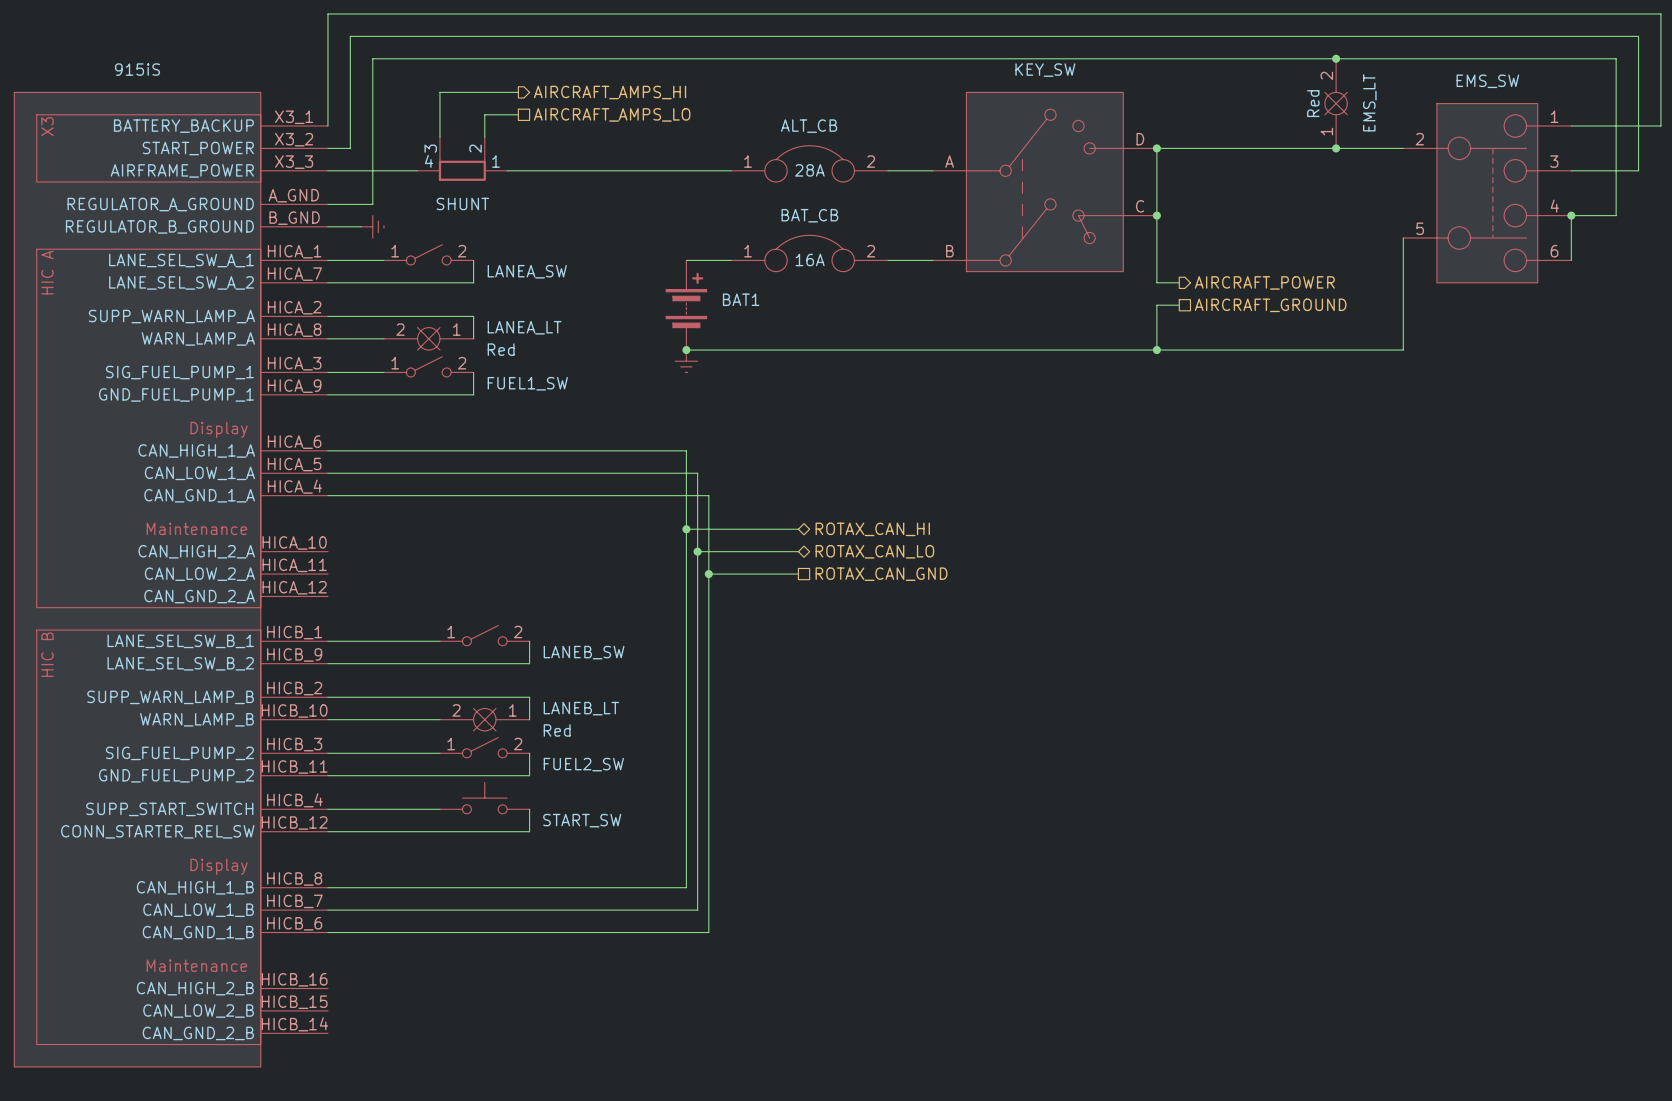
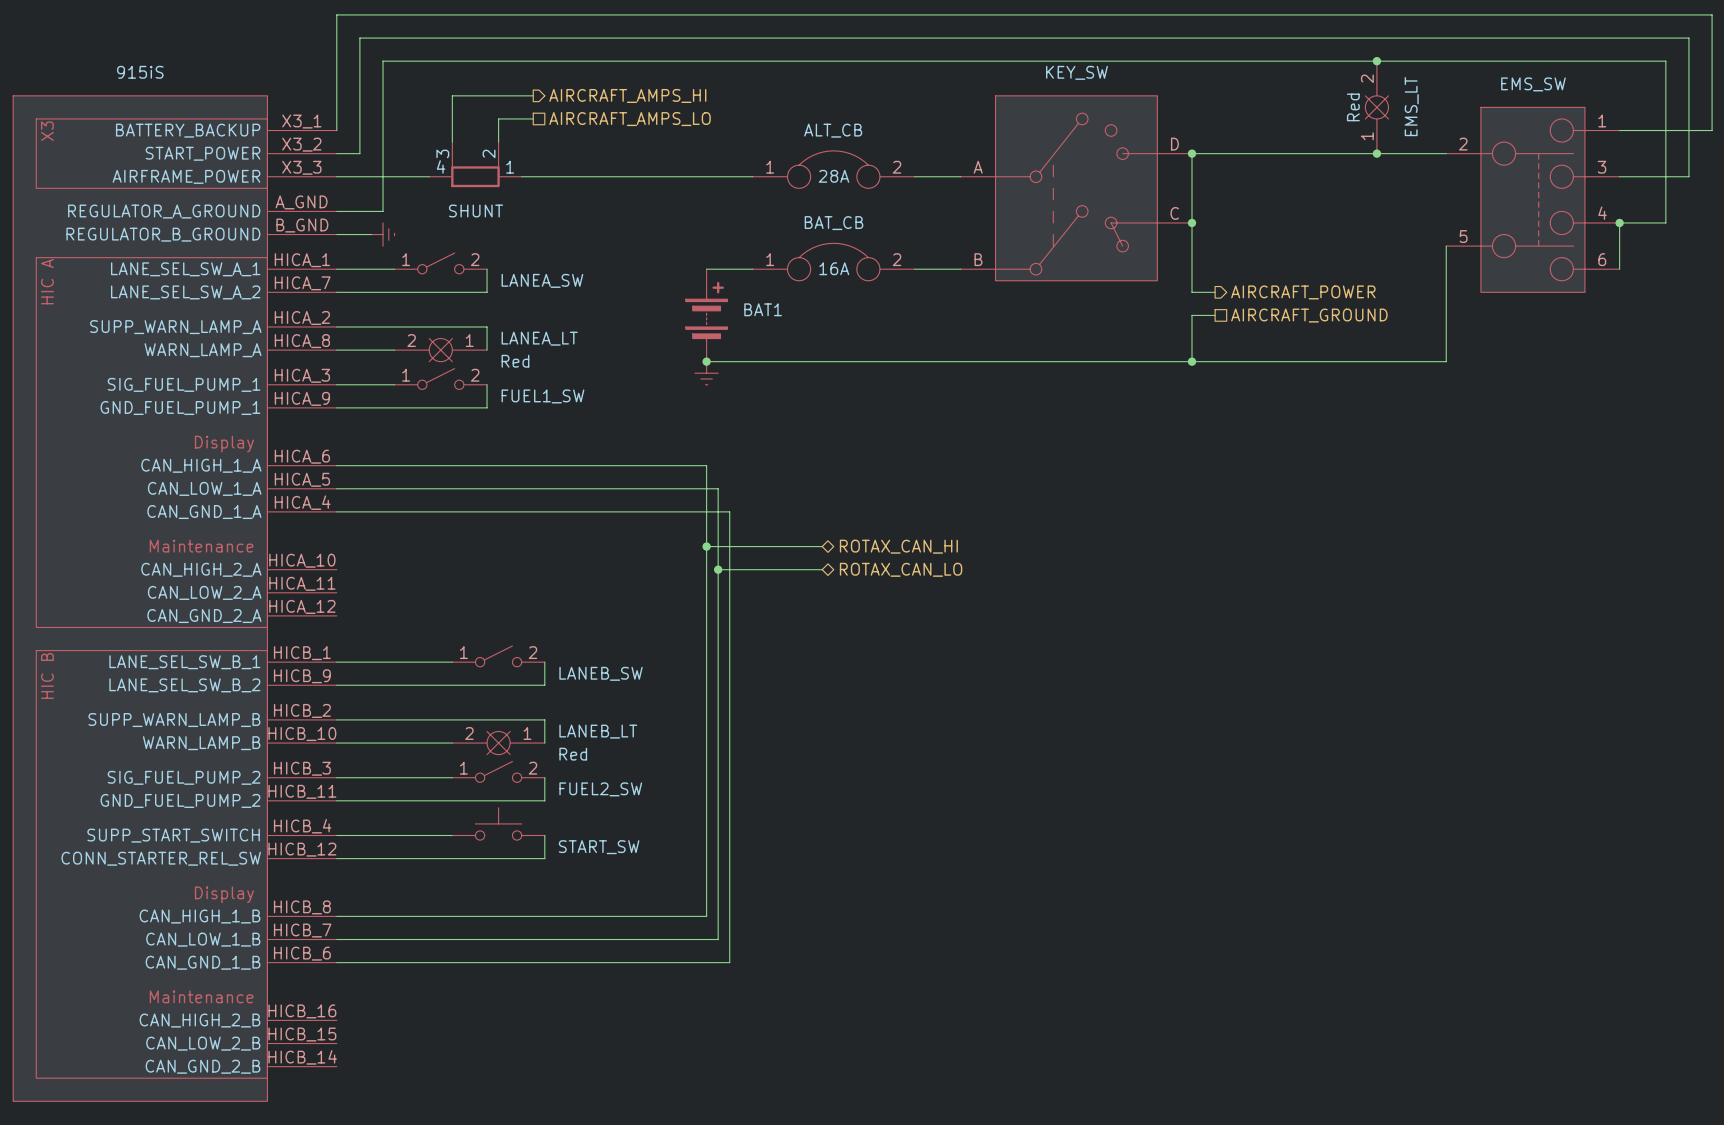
wire: (708, 574) (798, 574) -> none
junction: (708, 574) -> none
hierarchical label: ROTAX_CAN_GND (881, 574) -> none

